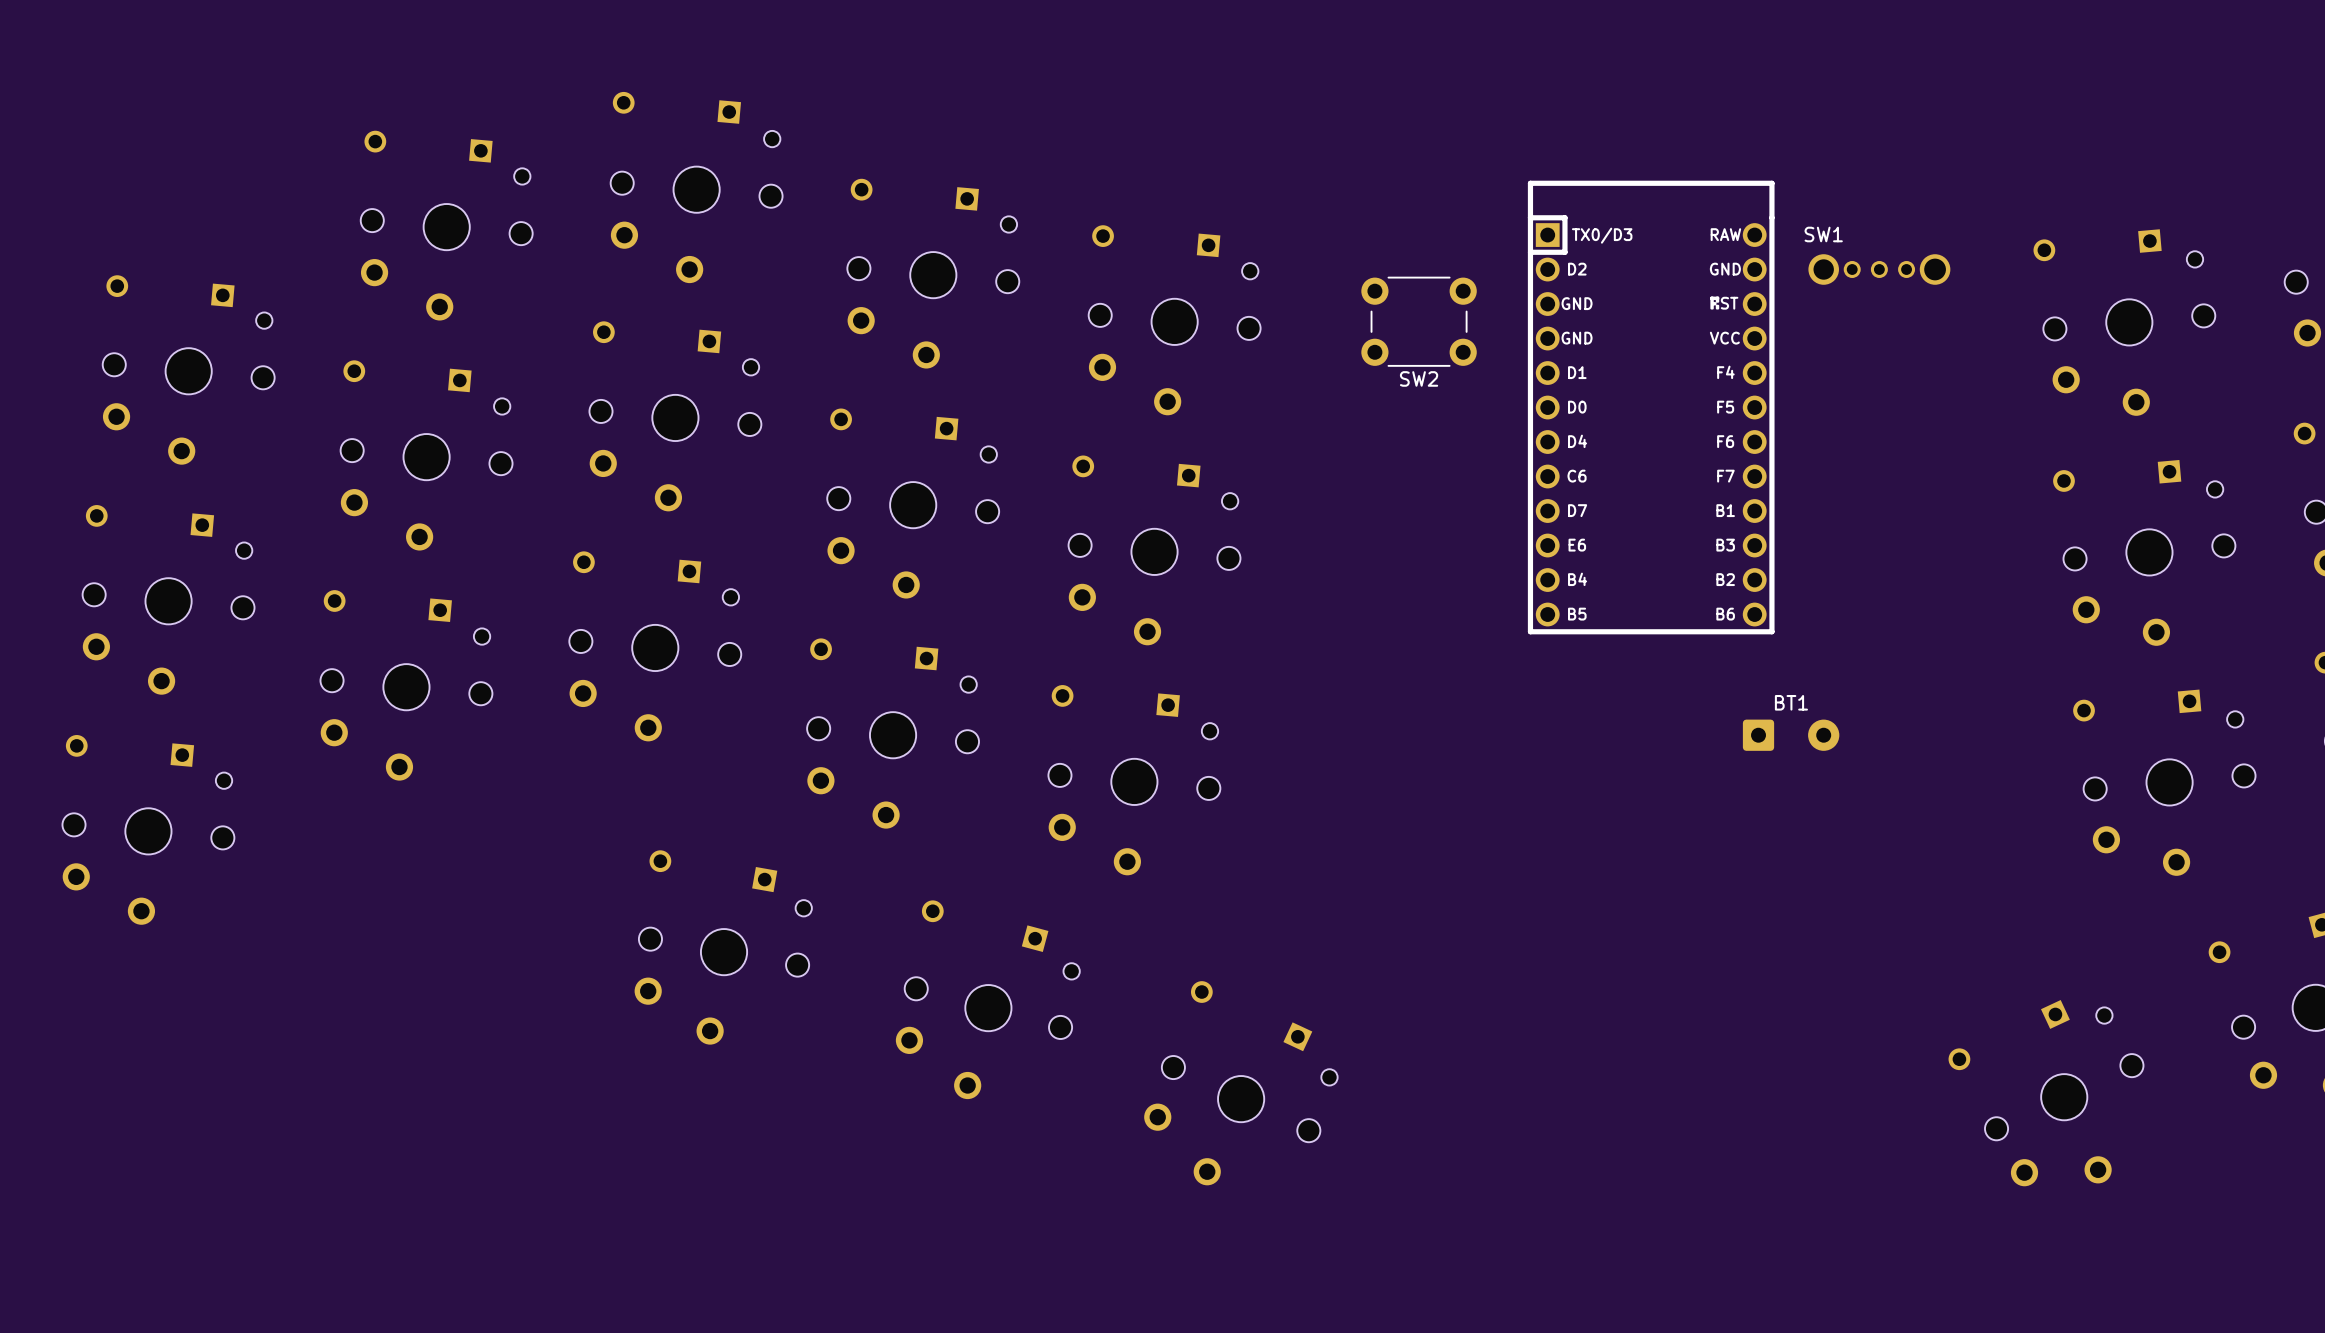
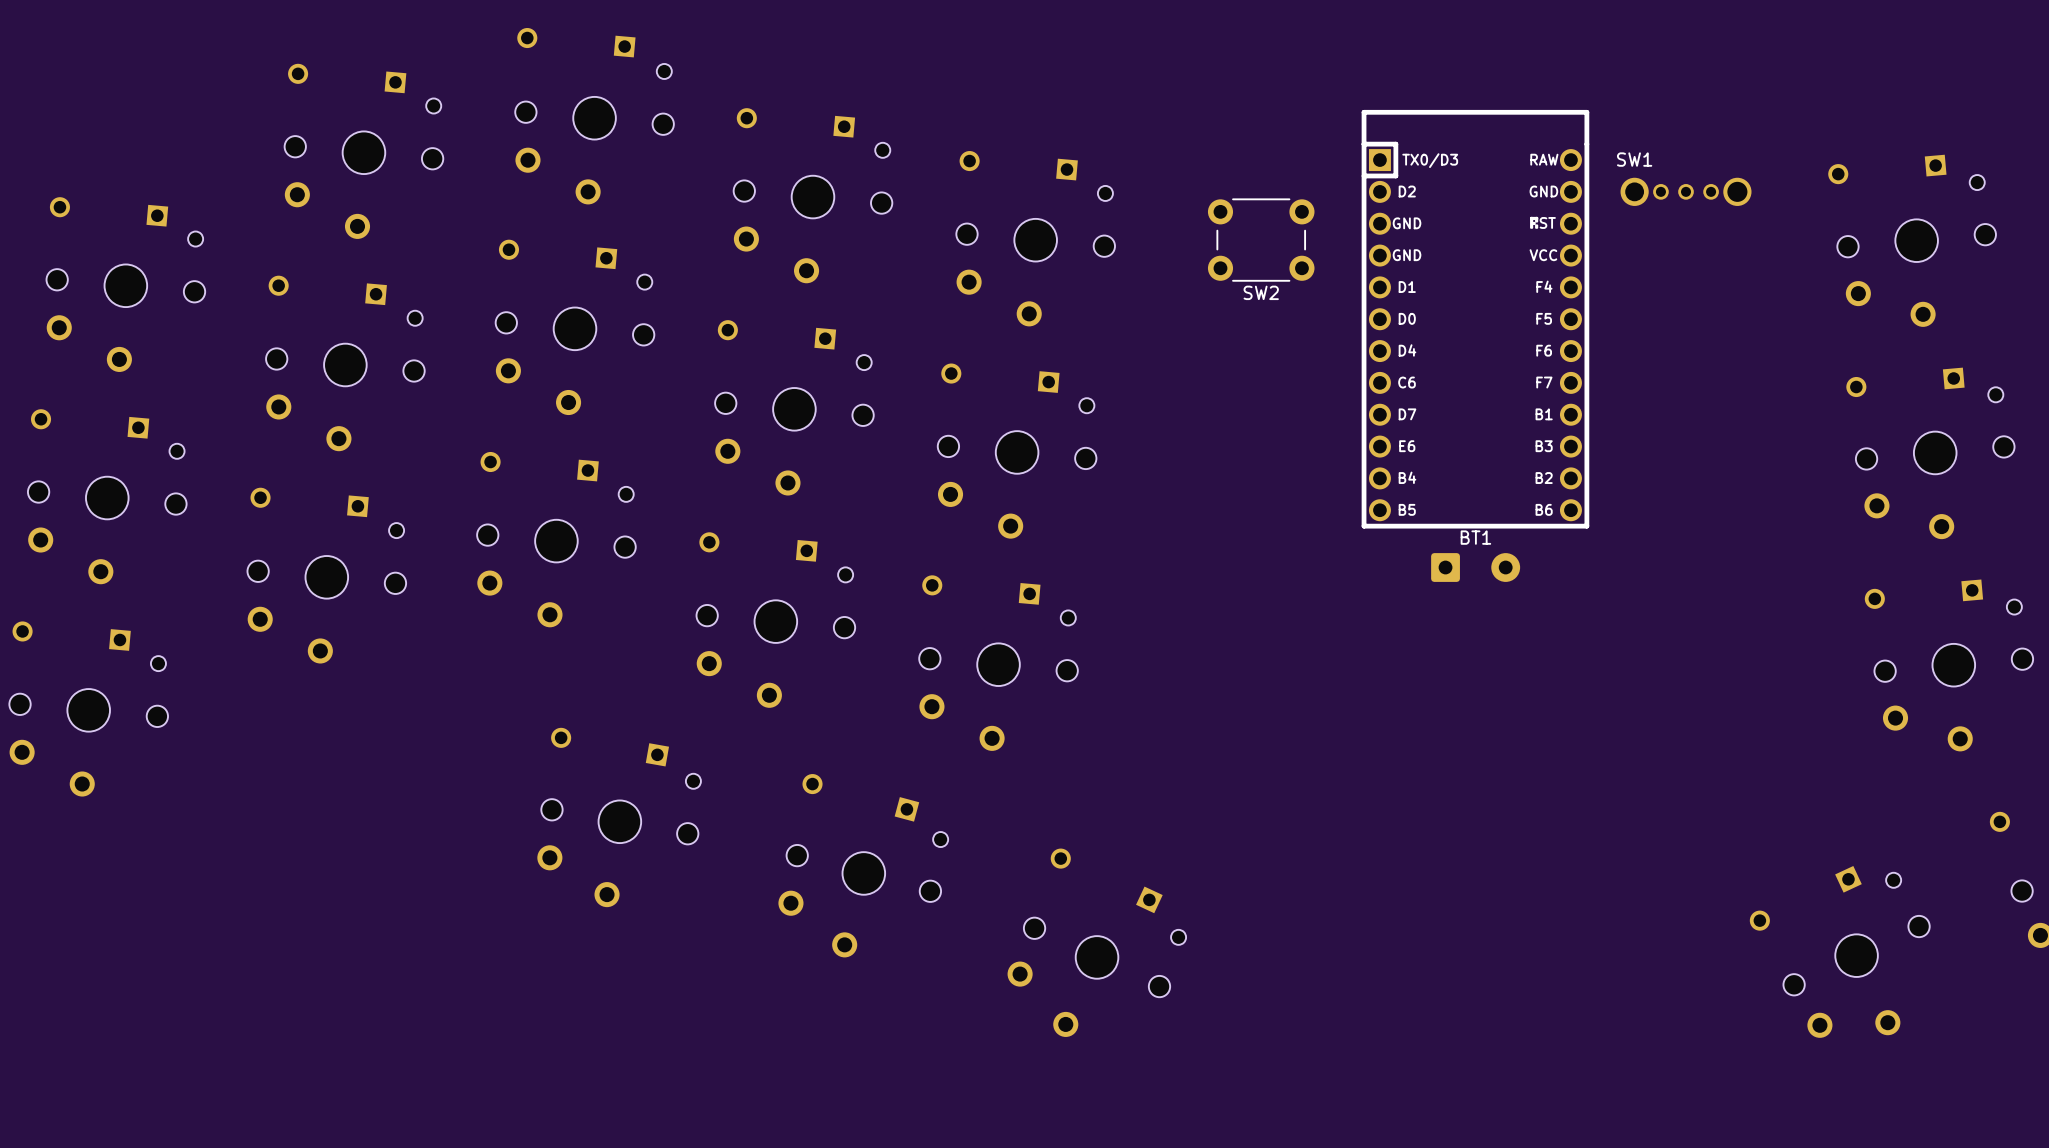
BT1 position: (1791, 735) -> (1475, 567)

